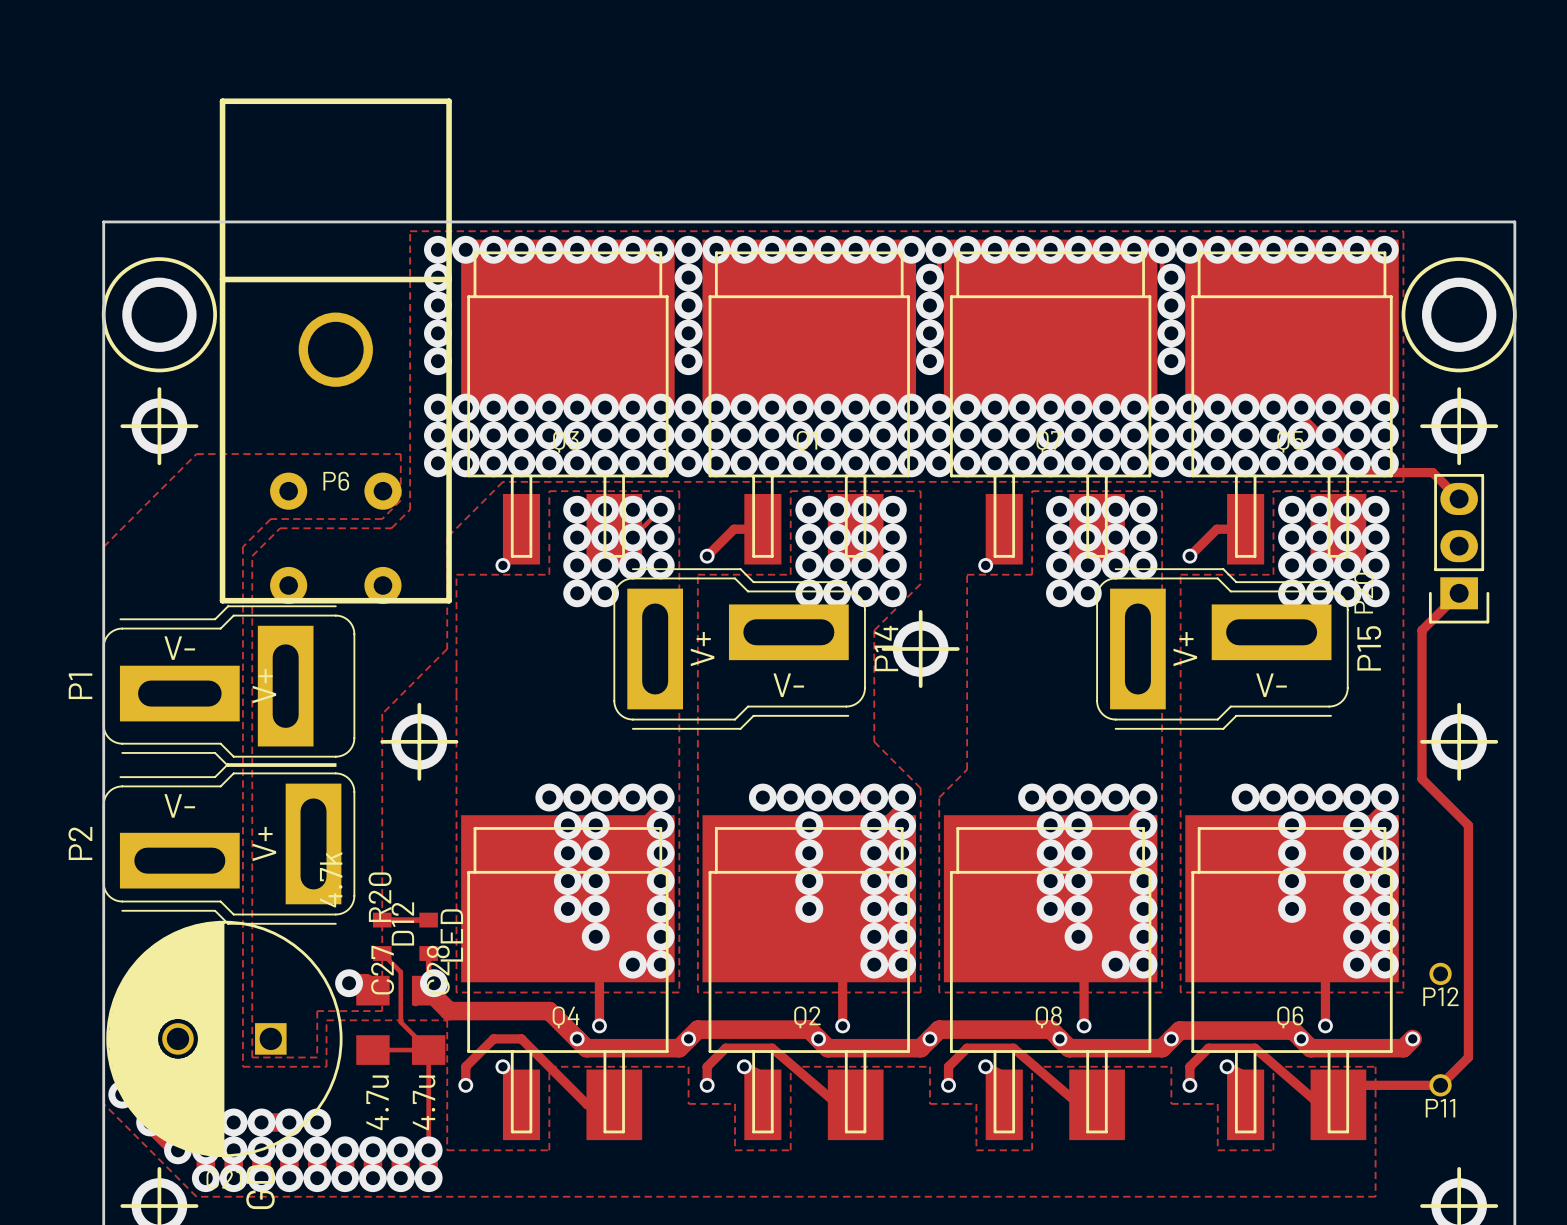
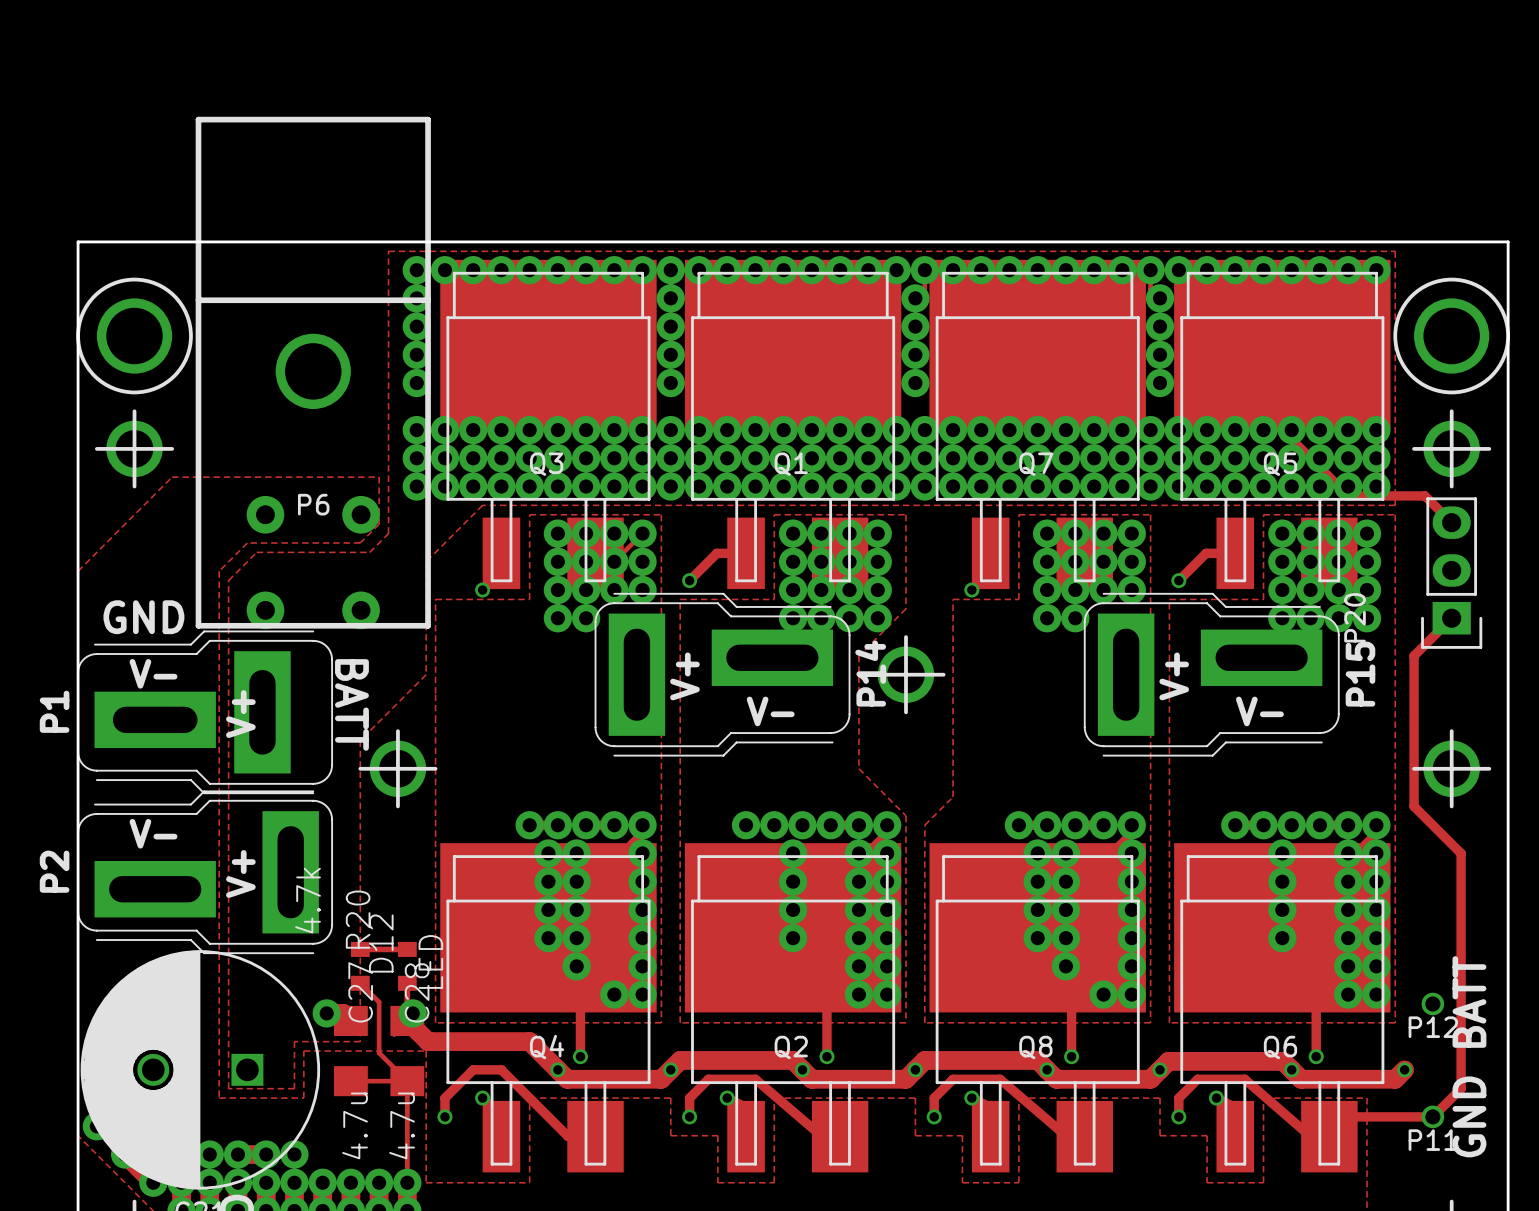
text: none -> GND (143, 617)
text: none -> BATT (351, 704)
text: none -> BATT (1469, 1001)
text: none -> GND (1469, 1116)

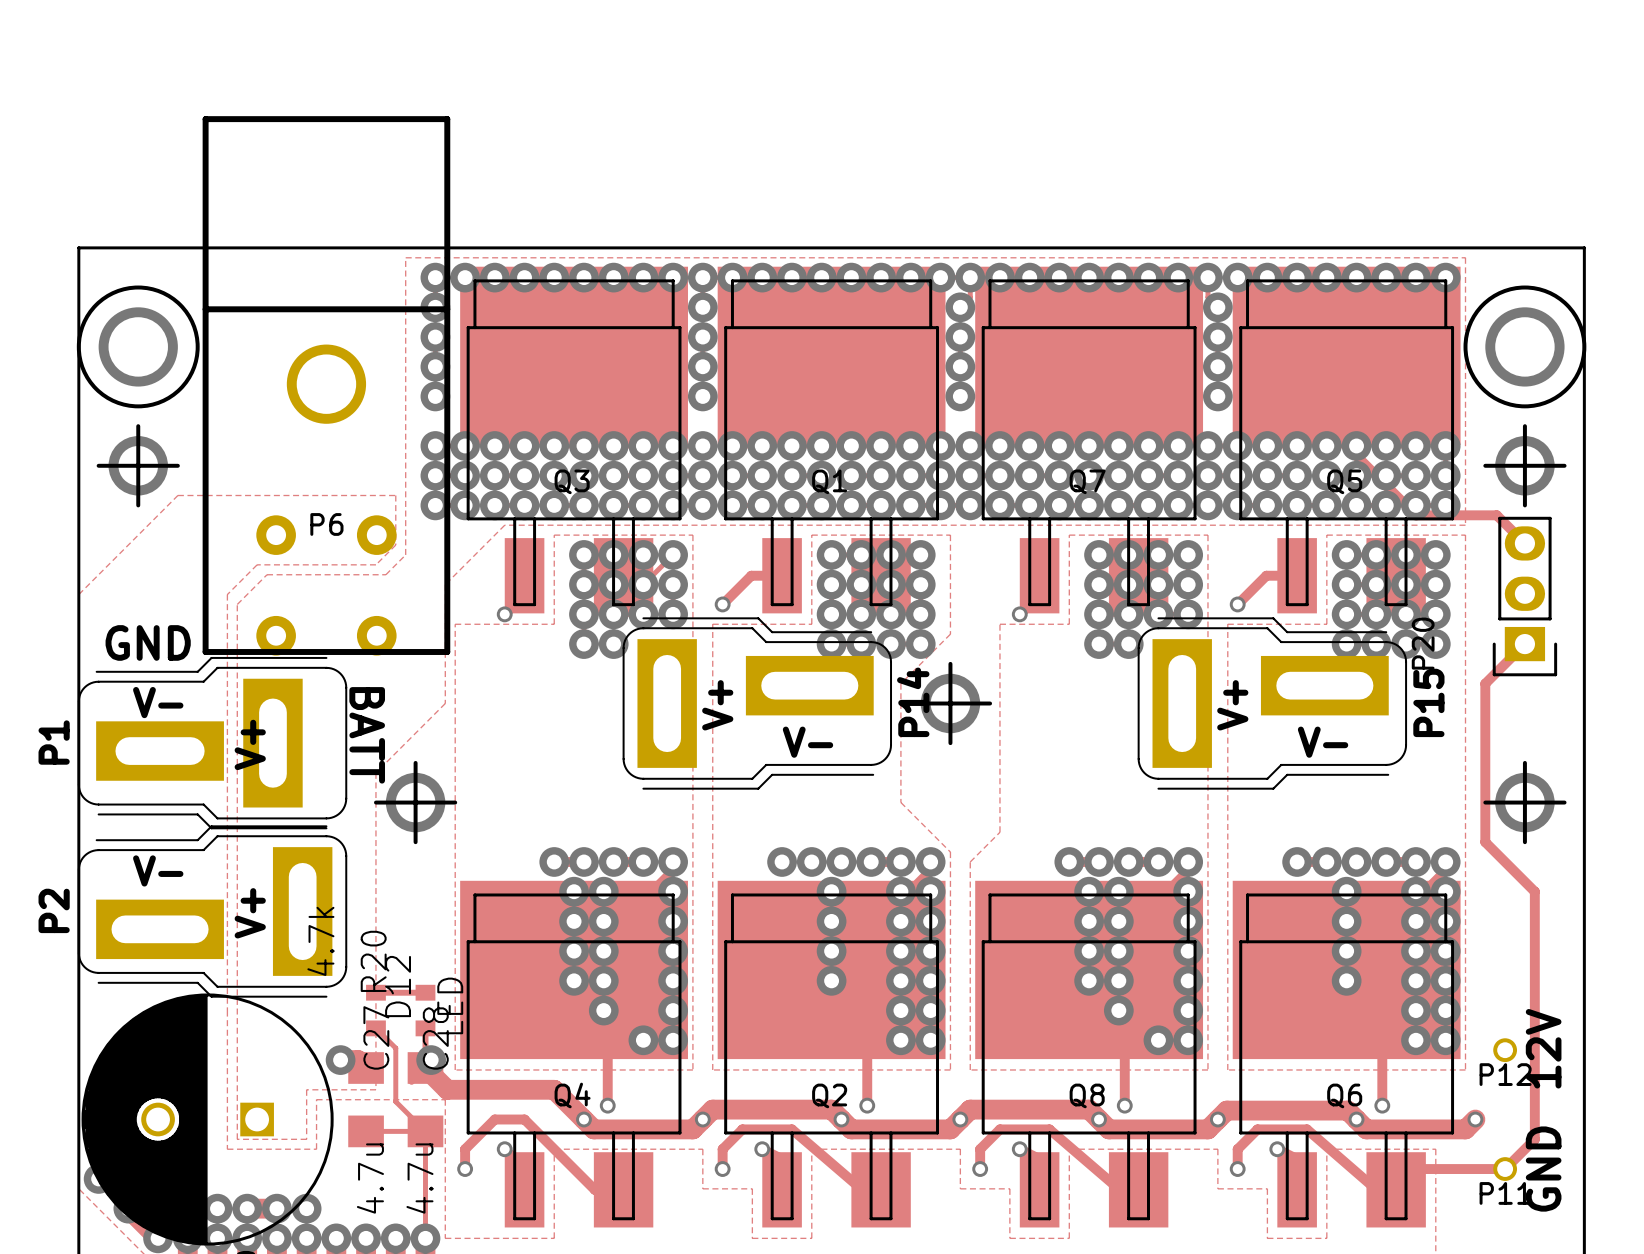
text: BATT (1469, 1001) -> 12V (1543, 1048)

